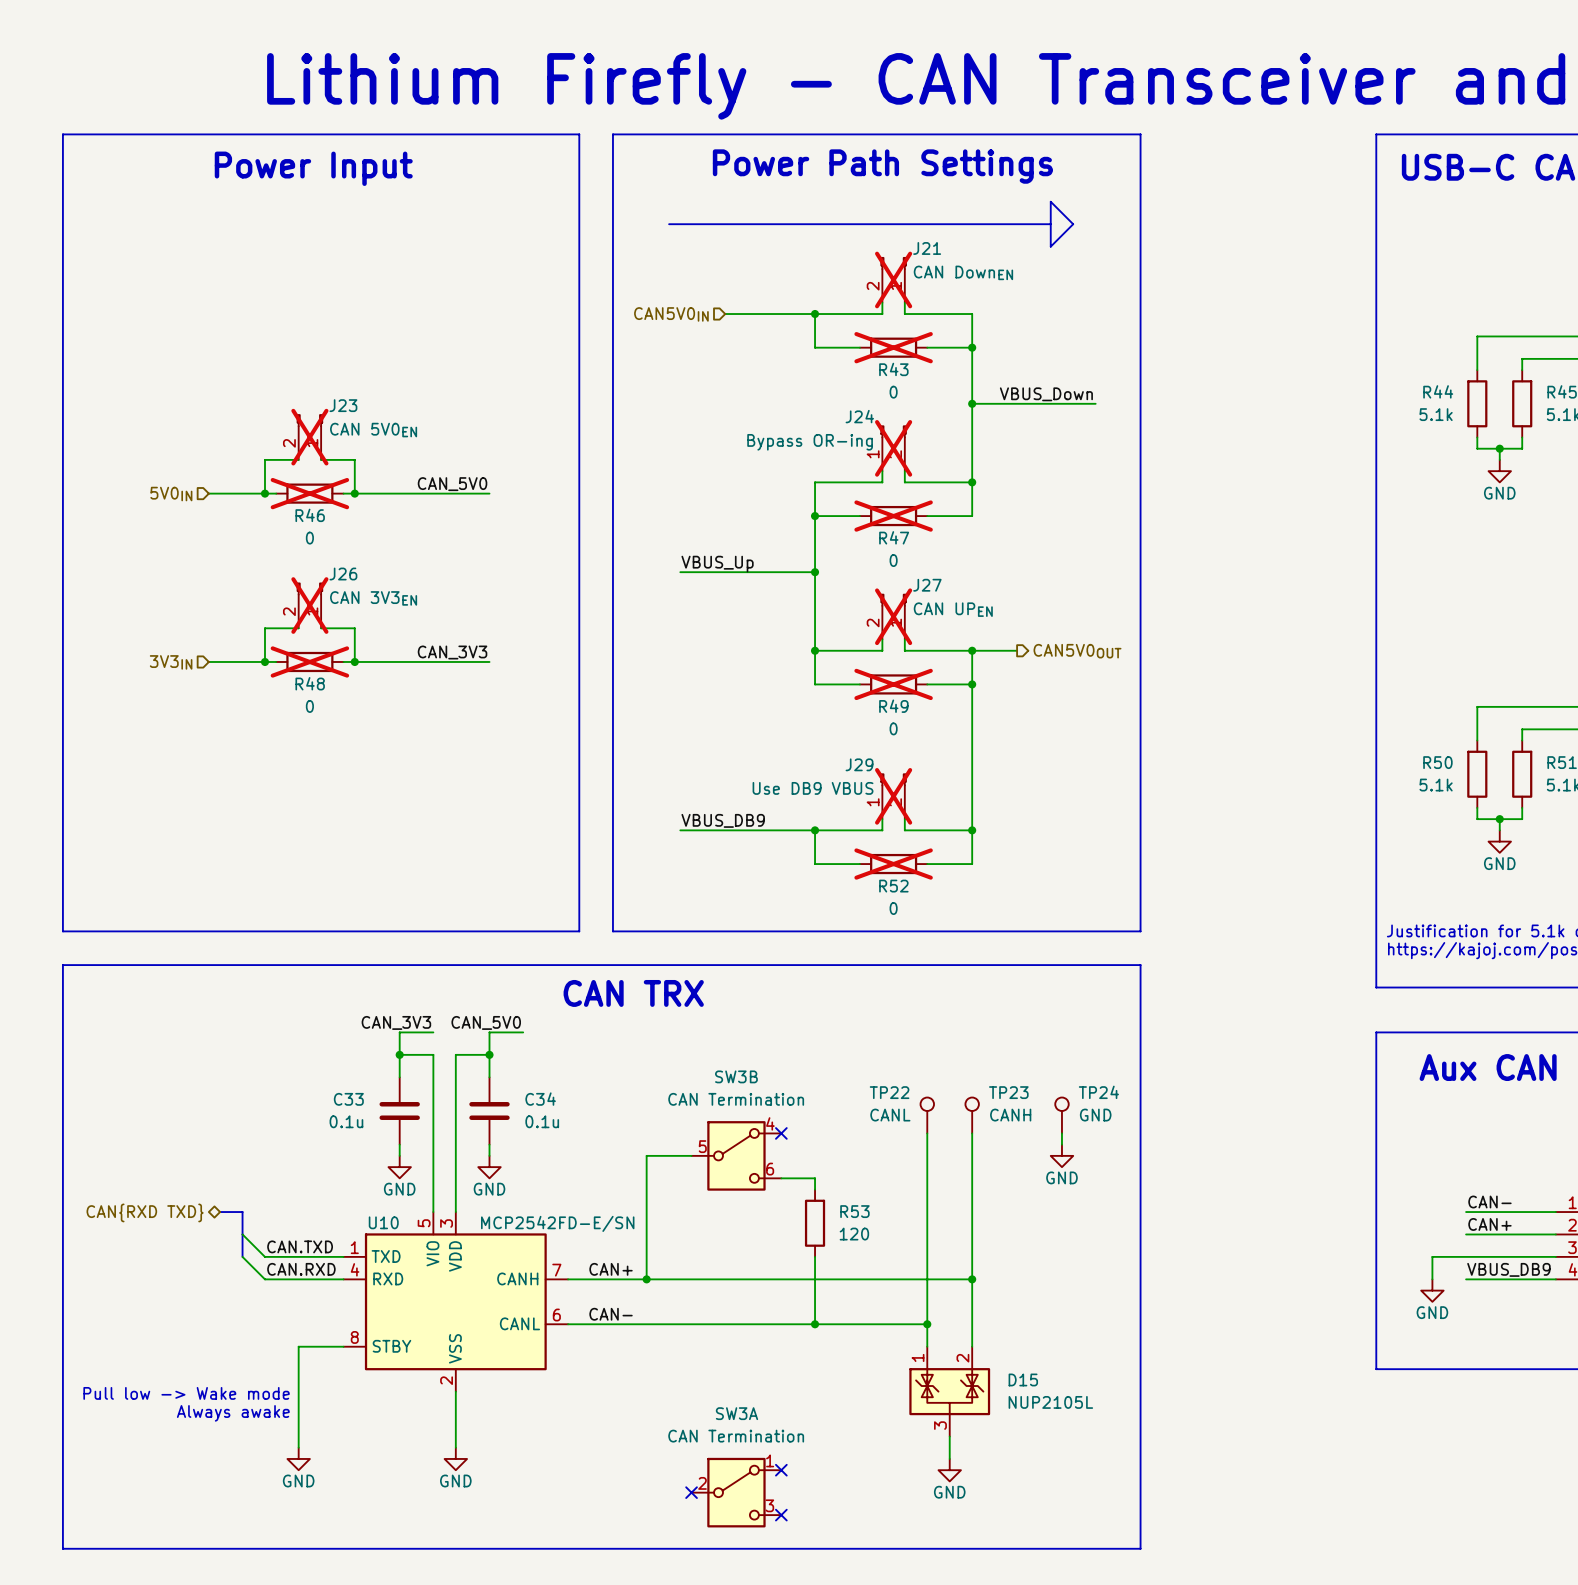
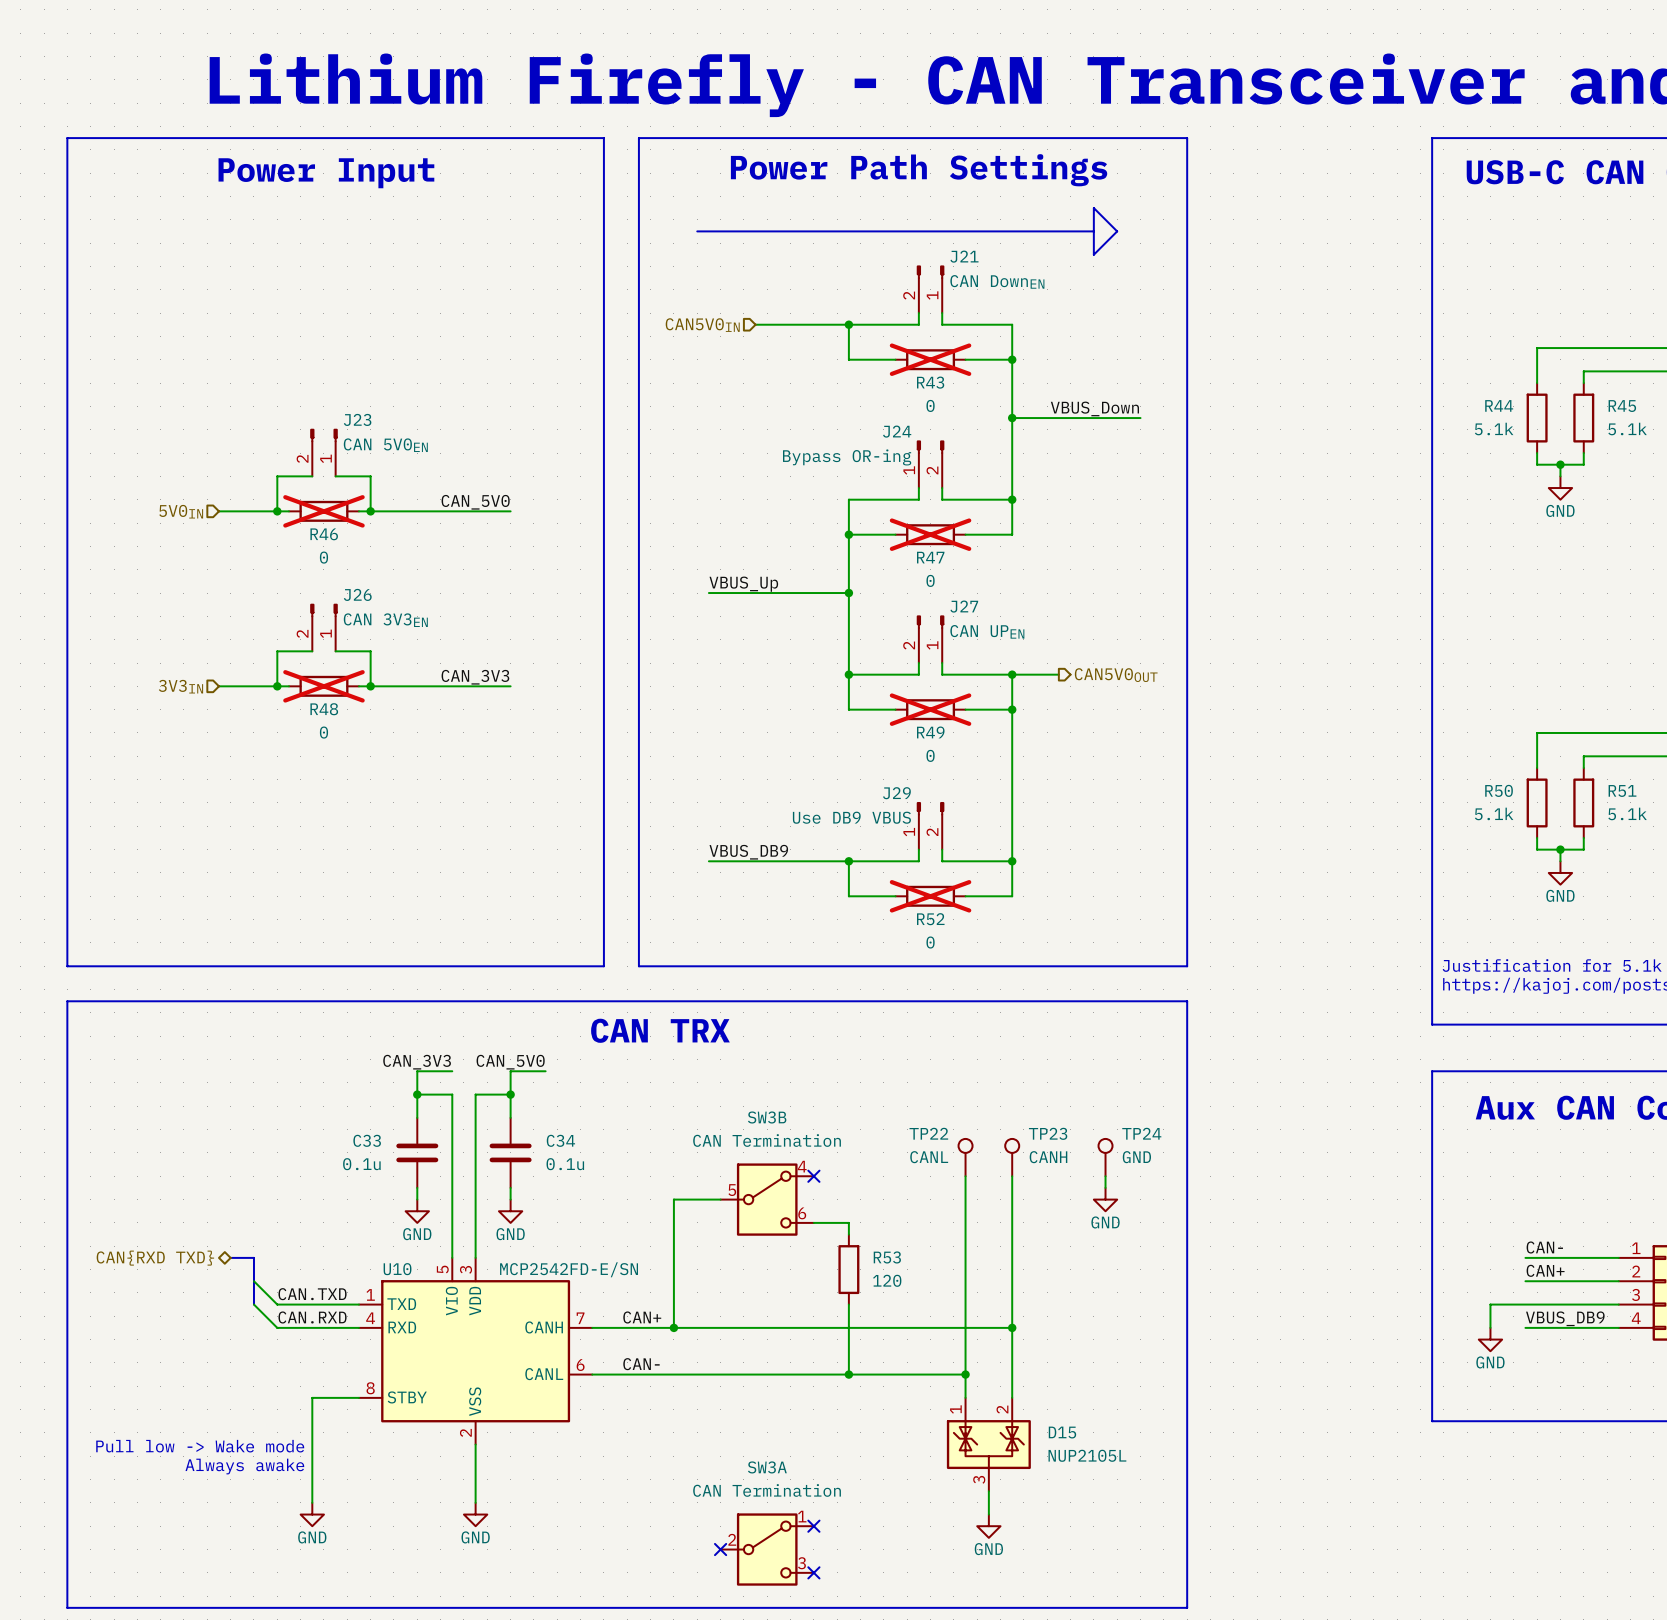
J21 do-not-place cross: (893, 279) -> none
J23 do-not-place cross: (309, 437) -> none
J24 do-not-place cross: (893, 448) -> none
J26 do-not-place cross: (309, 605) -> none
J27 do-not-place cross: (893, 616) -> none
J29 do-not-place cross: (893, 796) -> none

